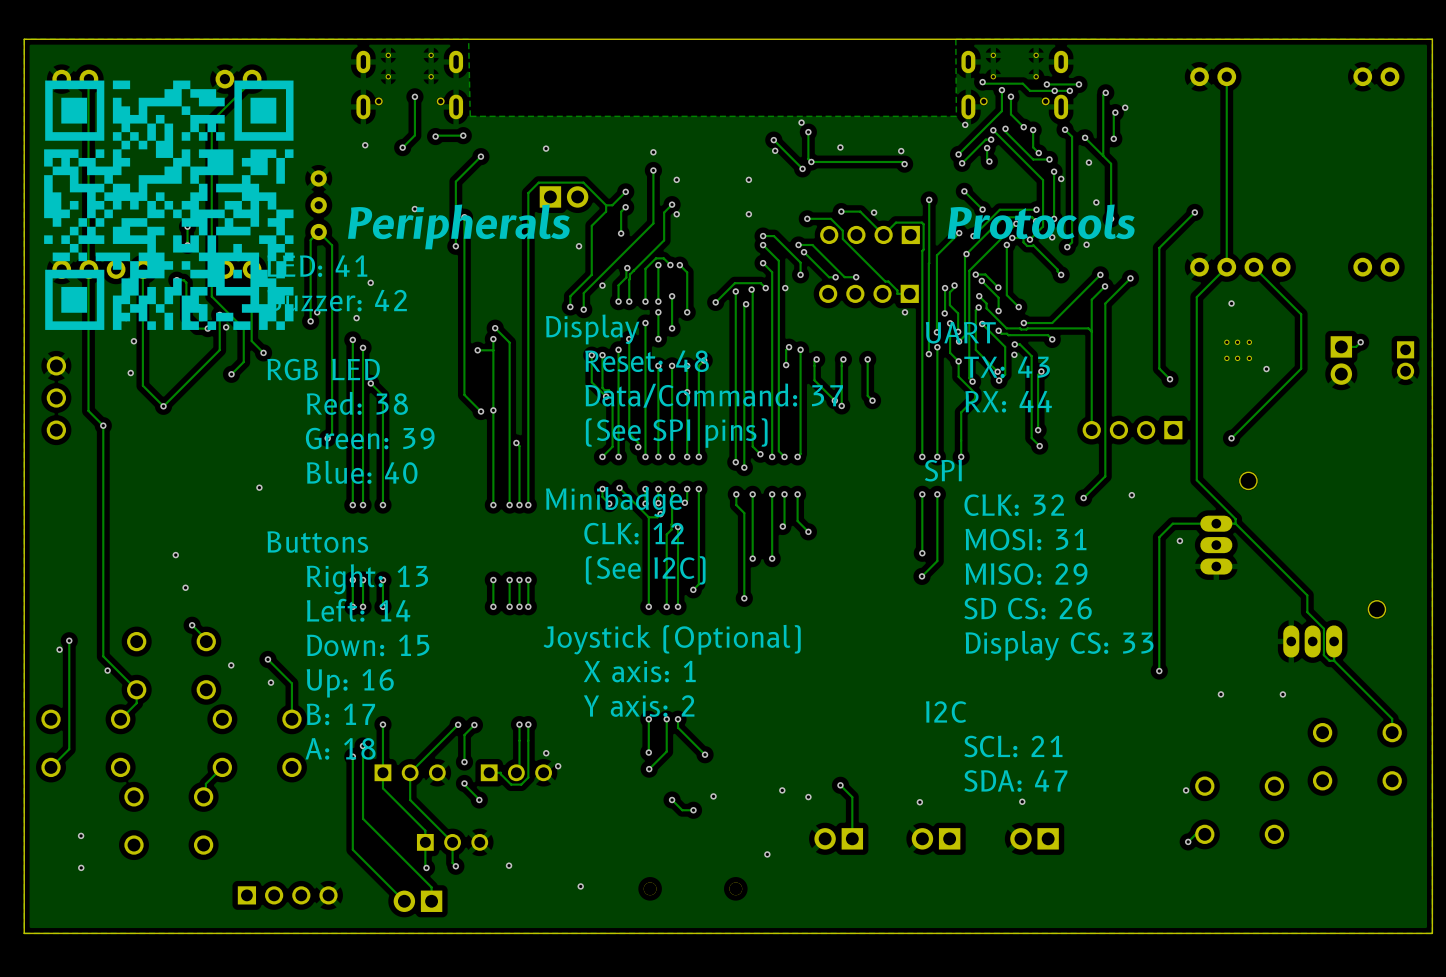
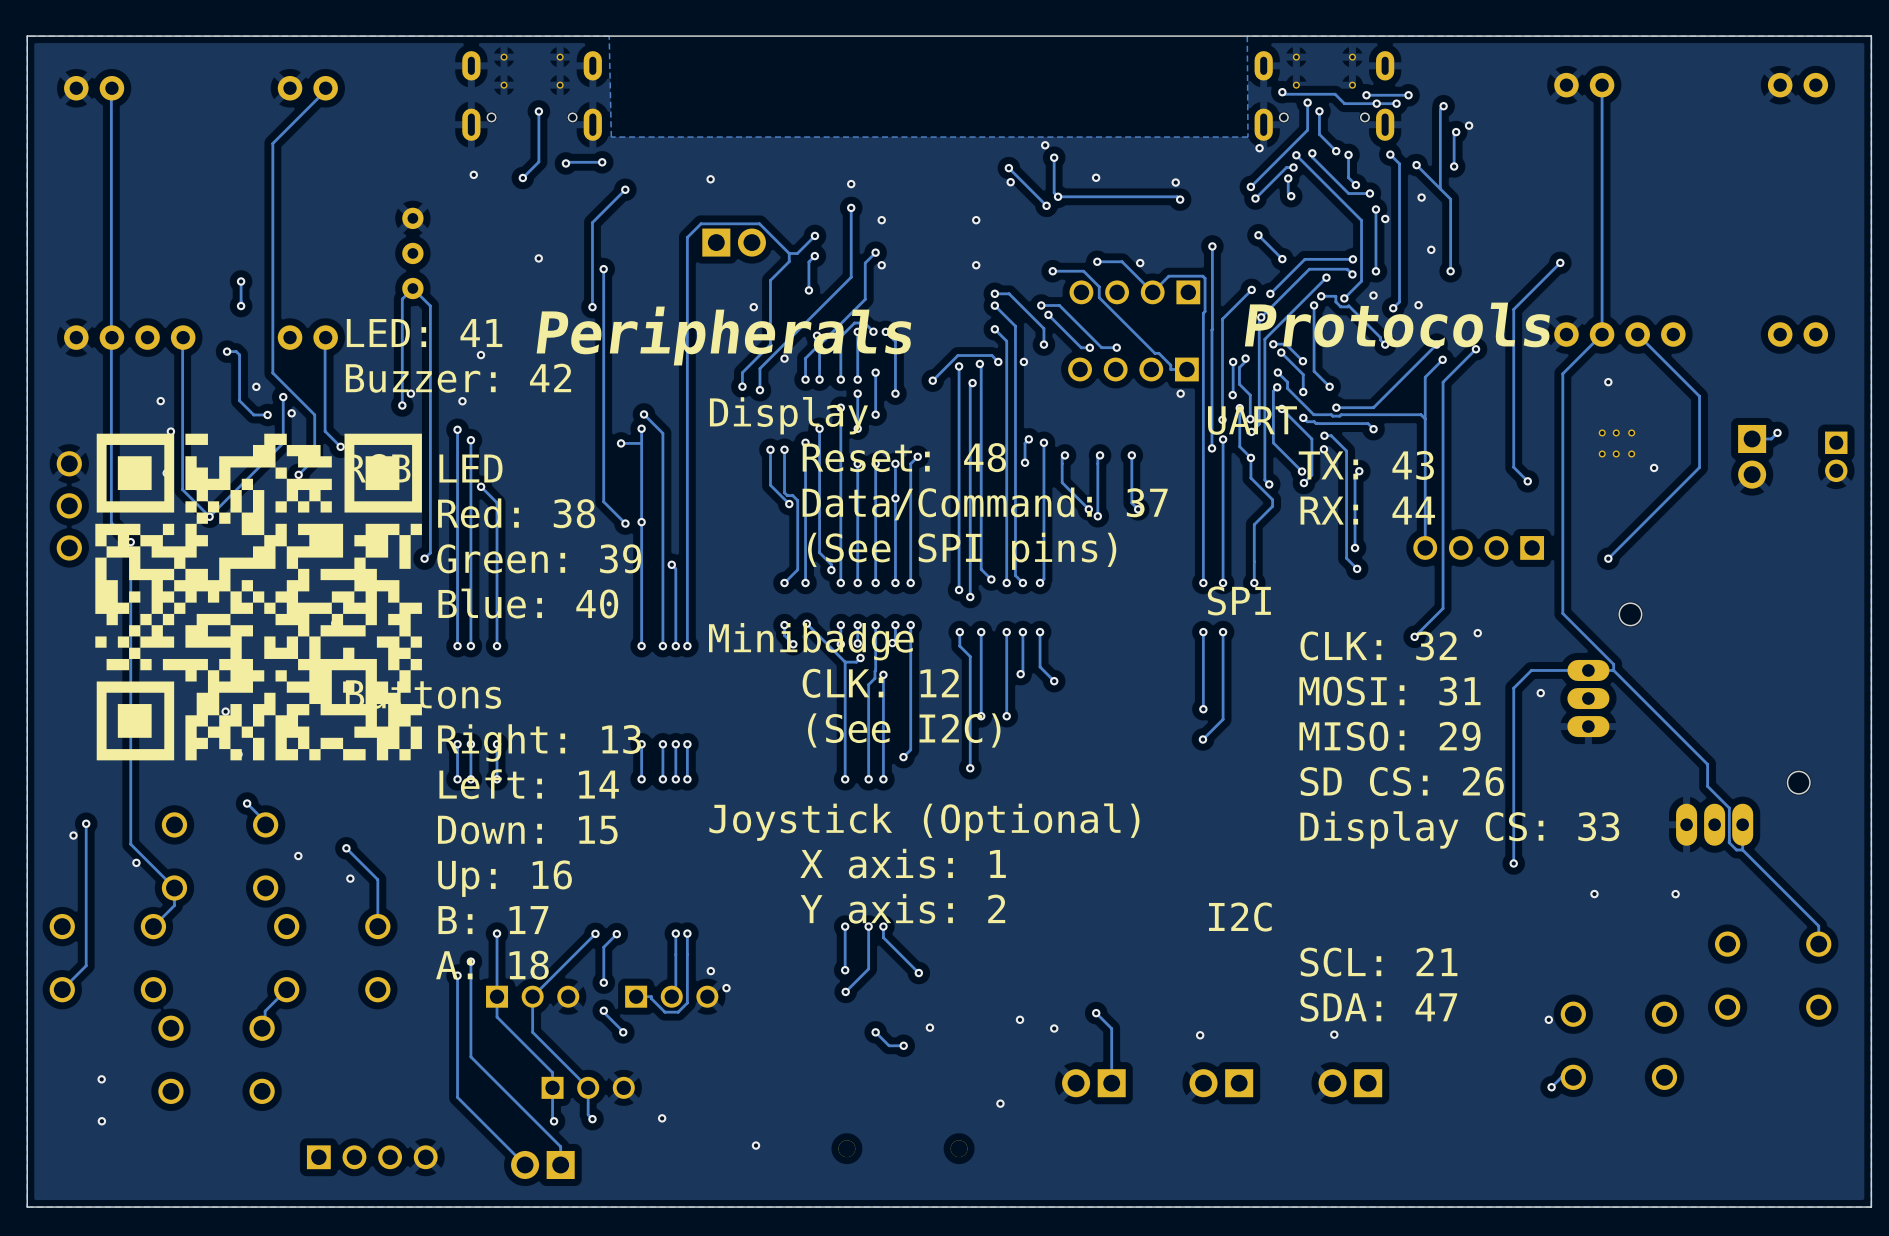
drawing position: (168, 205) -> (258, 597)
text position: Protocols (1041, 221) -> Protocols (1397, 324)
text position: Peripherals (458, 226) -> Peripherals (723, 336)

